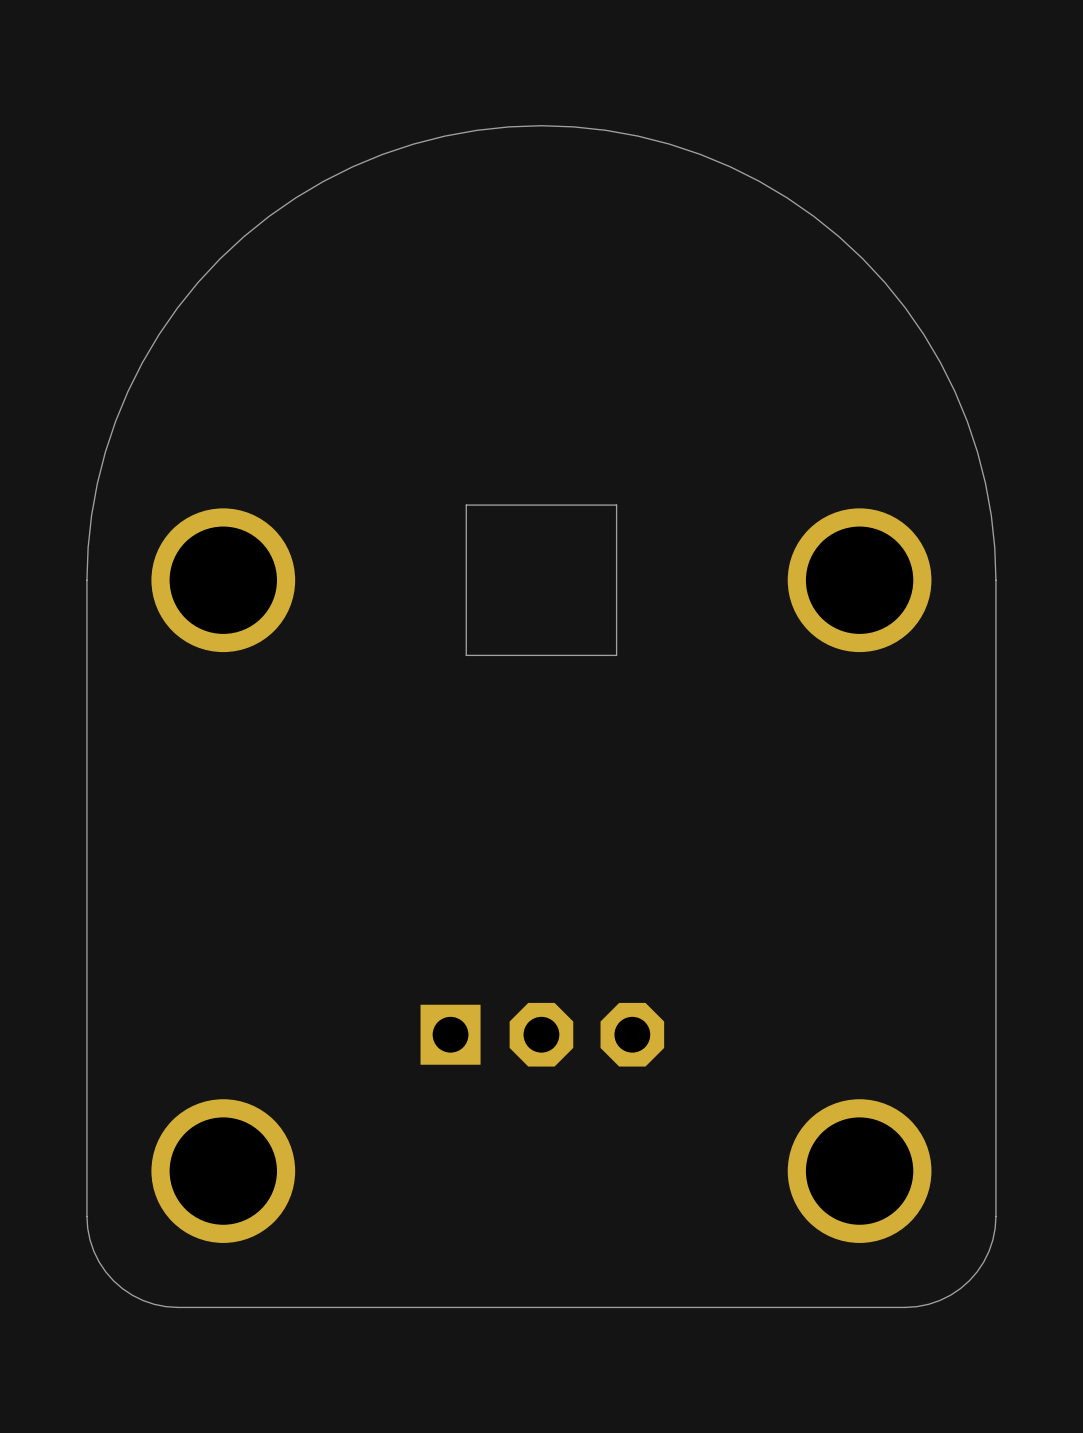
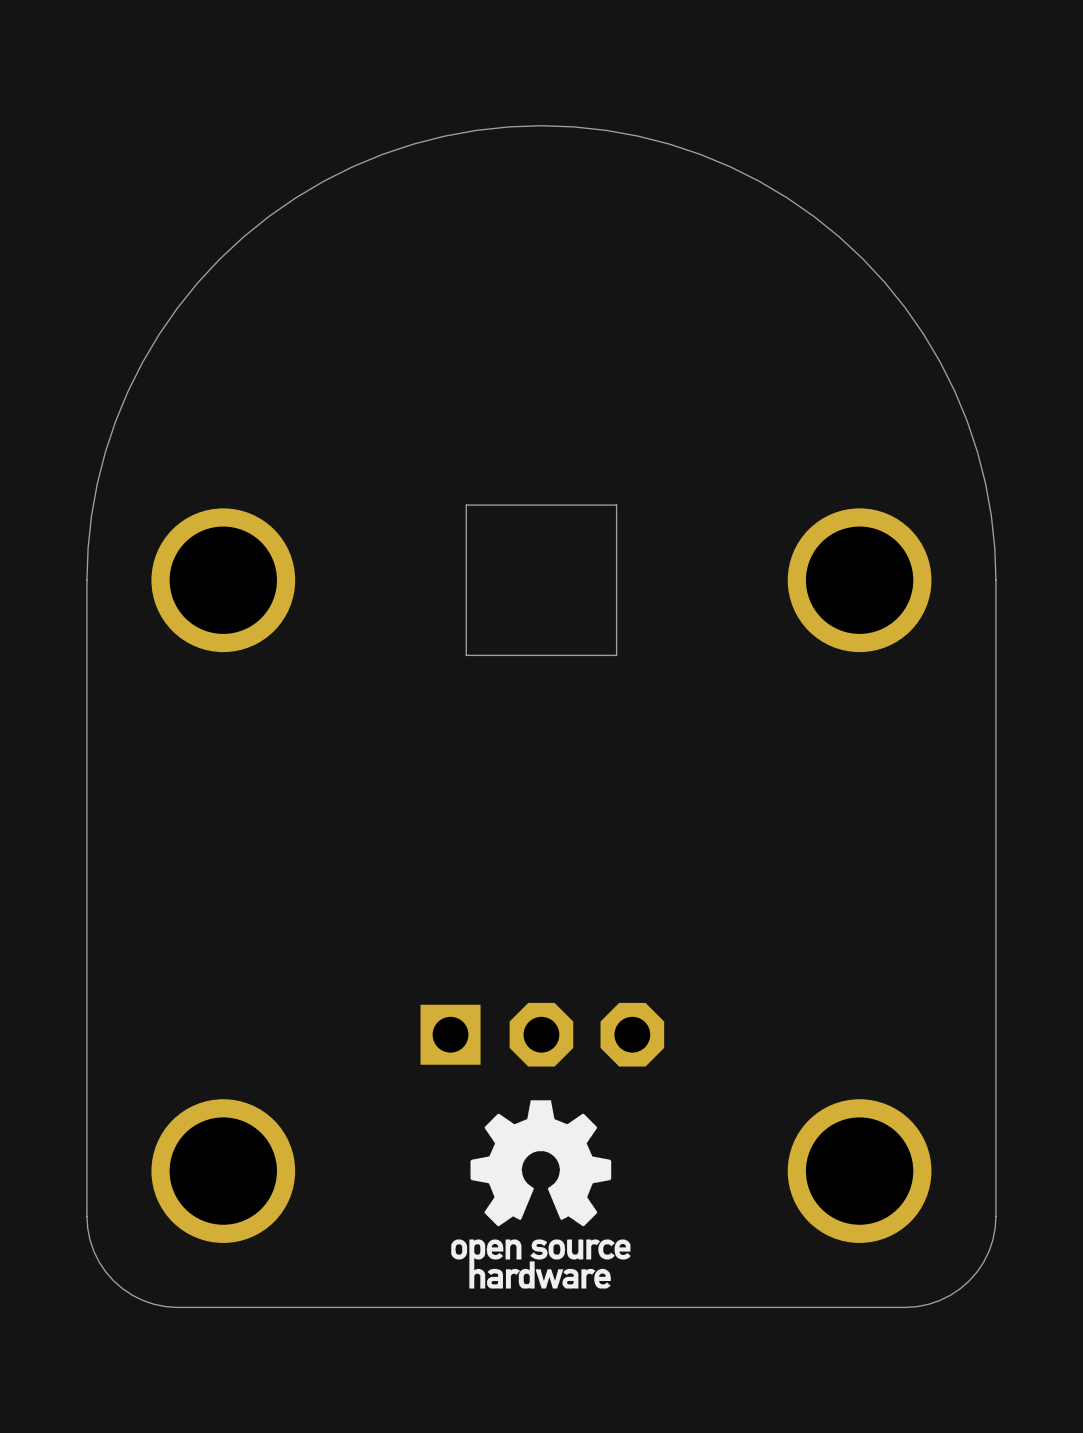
drawing: none -> [451, 1100, 631, 1289]

